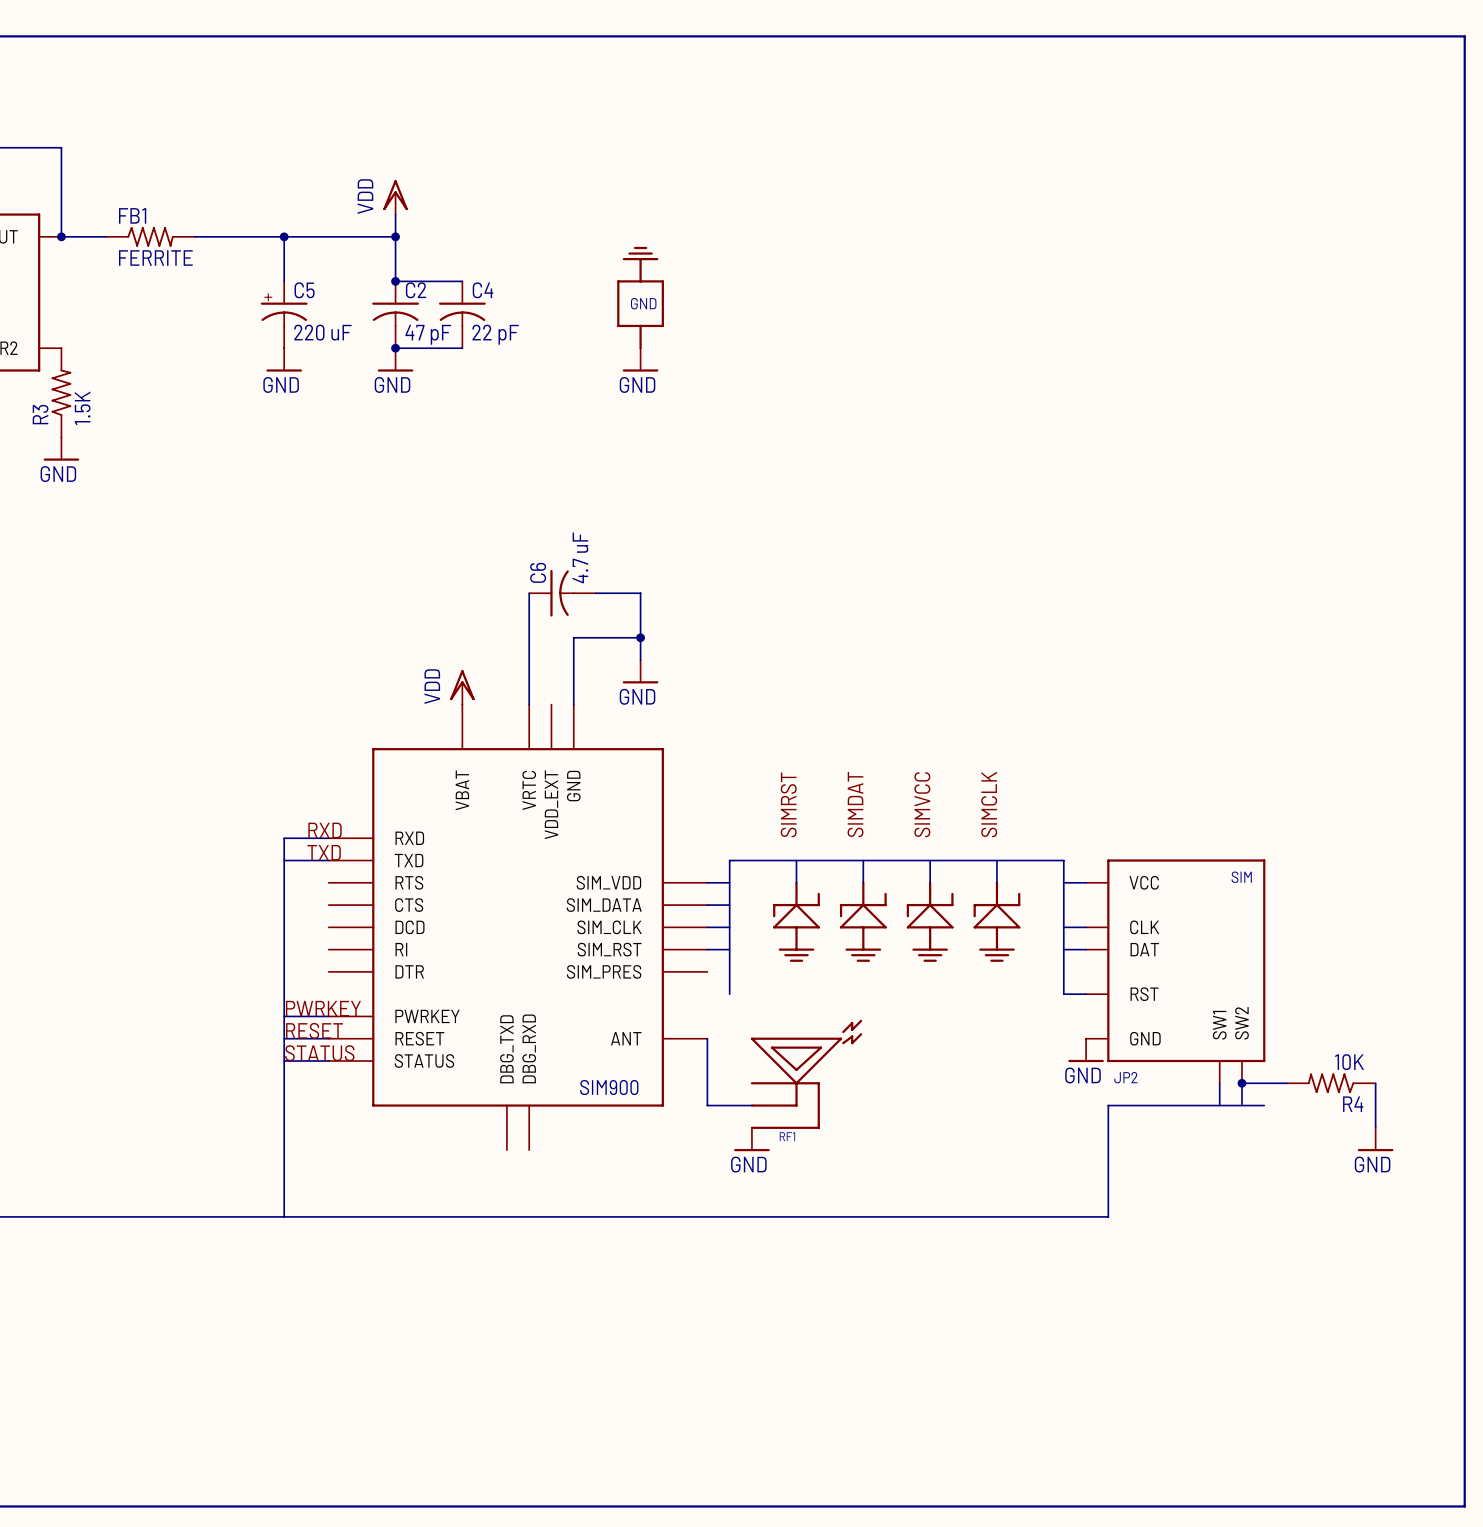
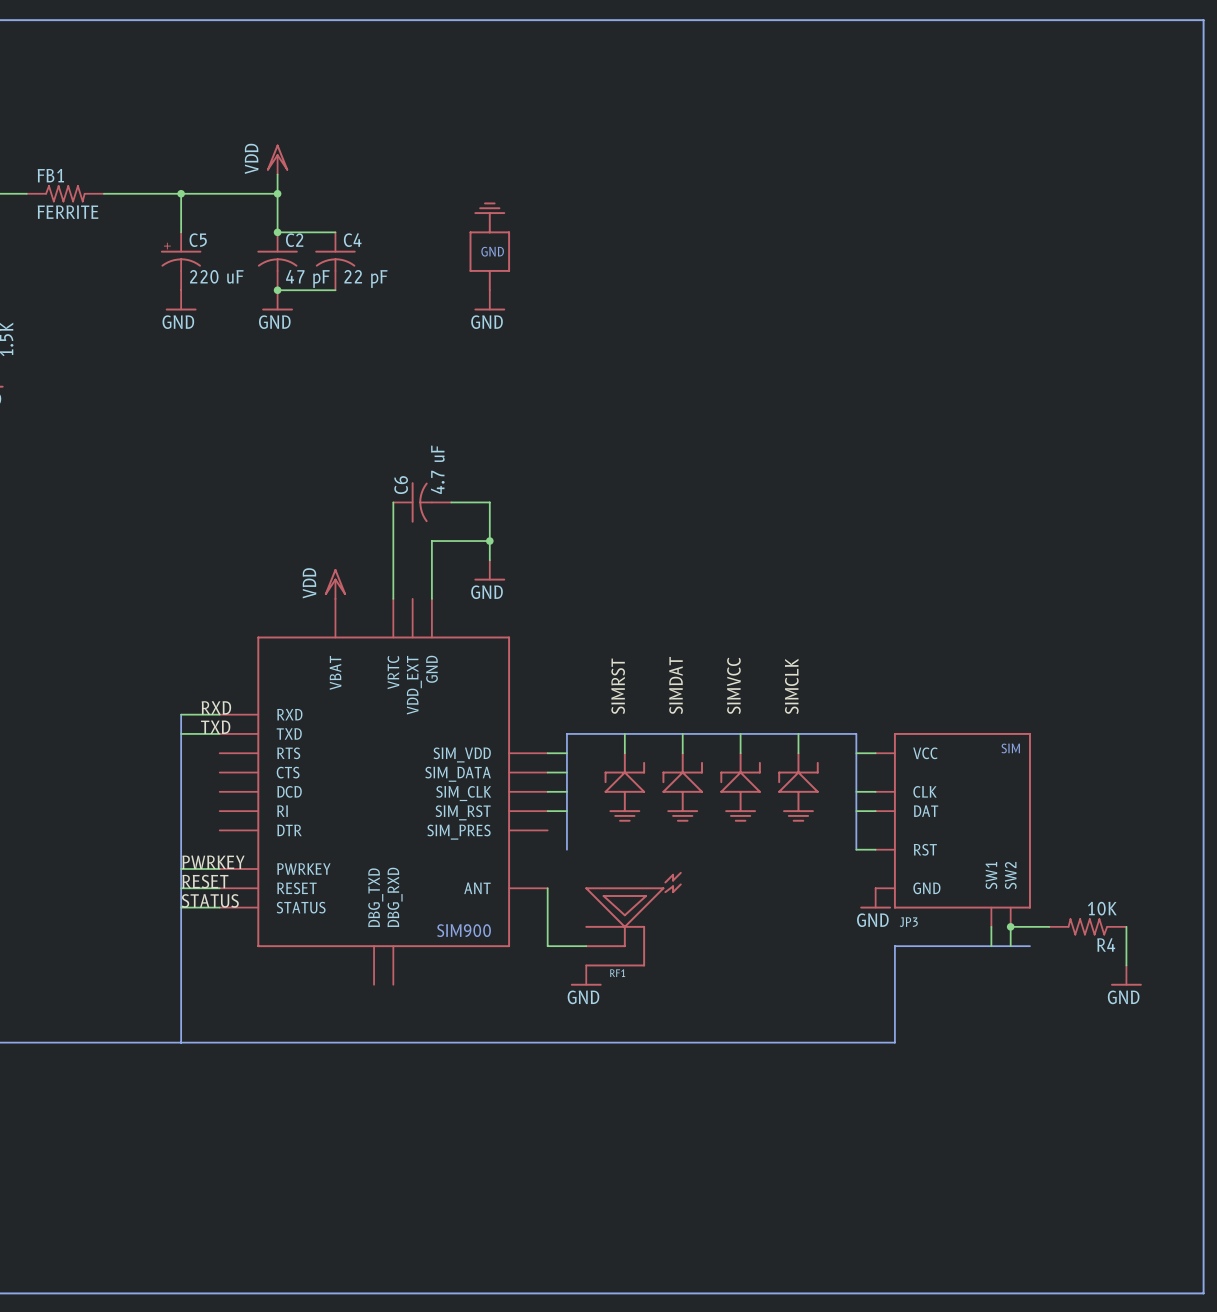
JP2 name: JP2 (1125, 1077) -> JP3 (908, 922)

